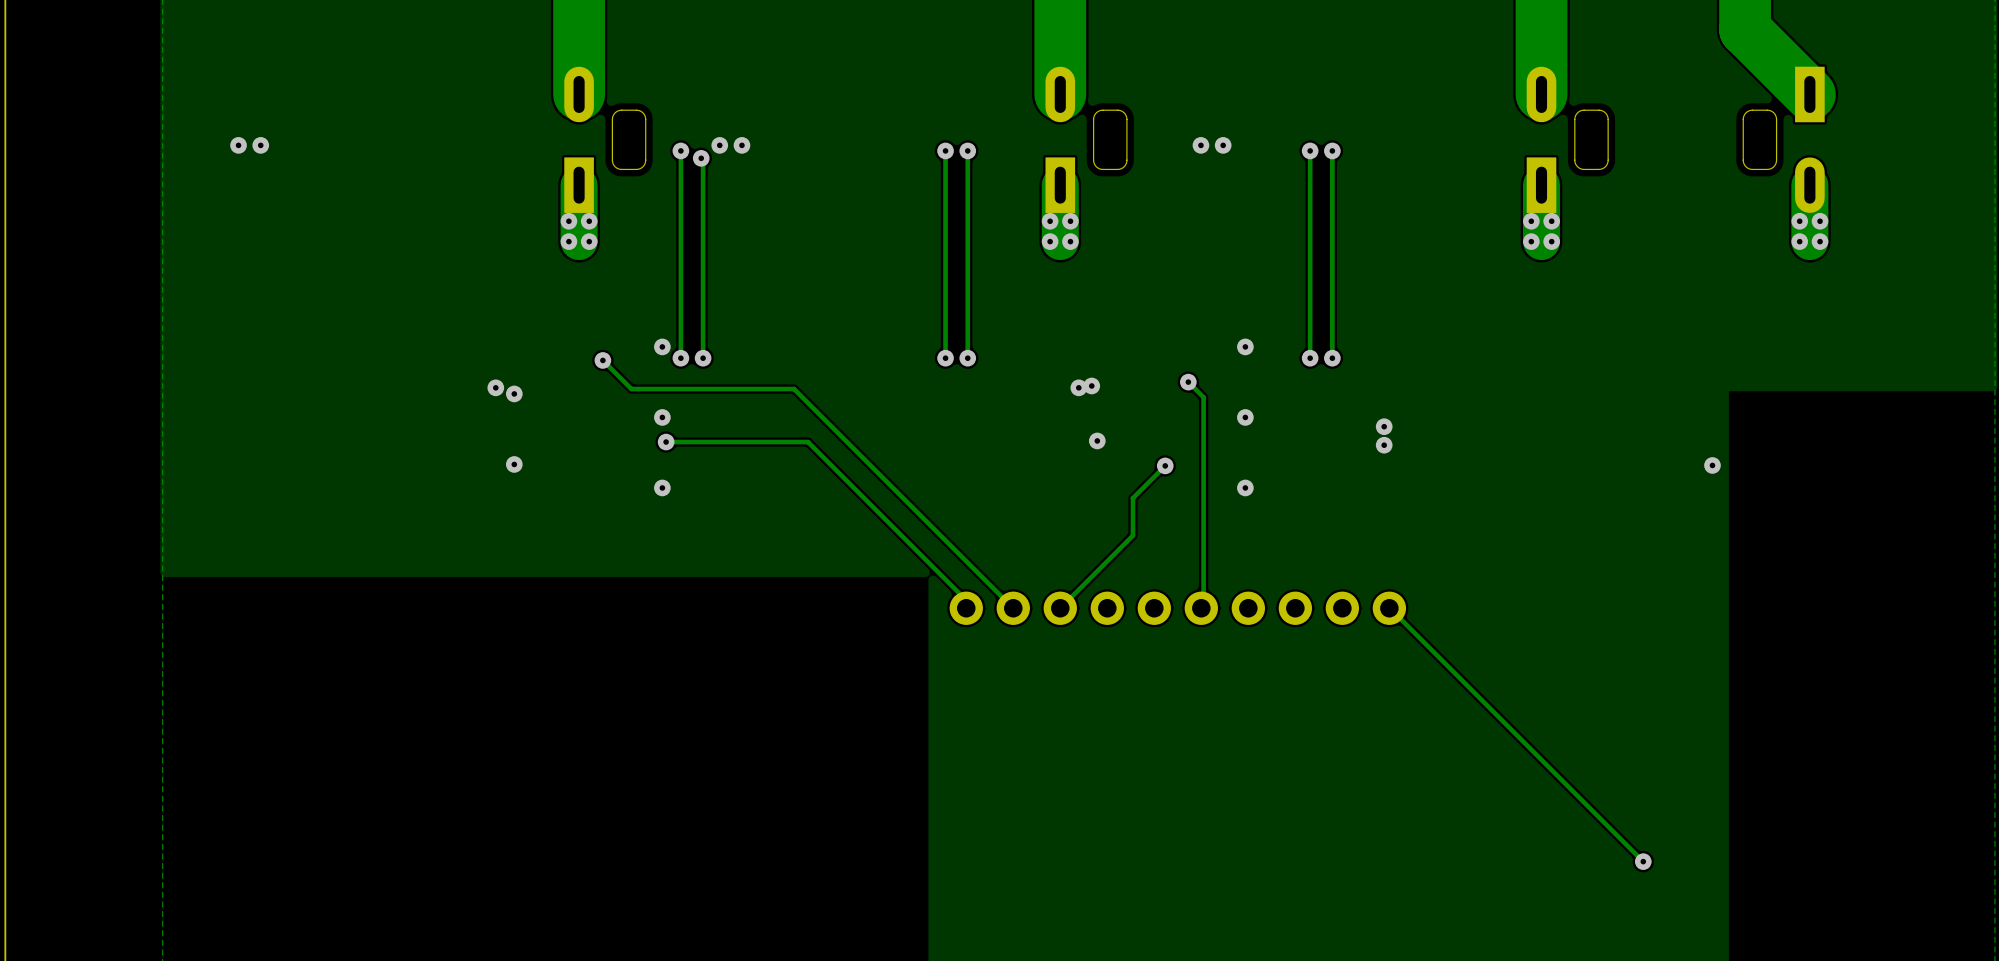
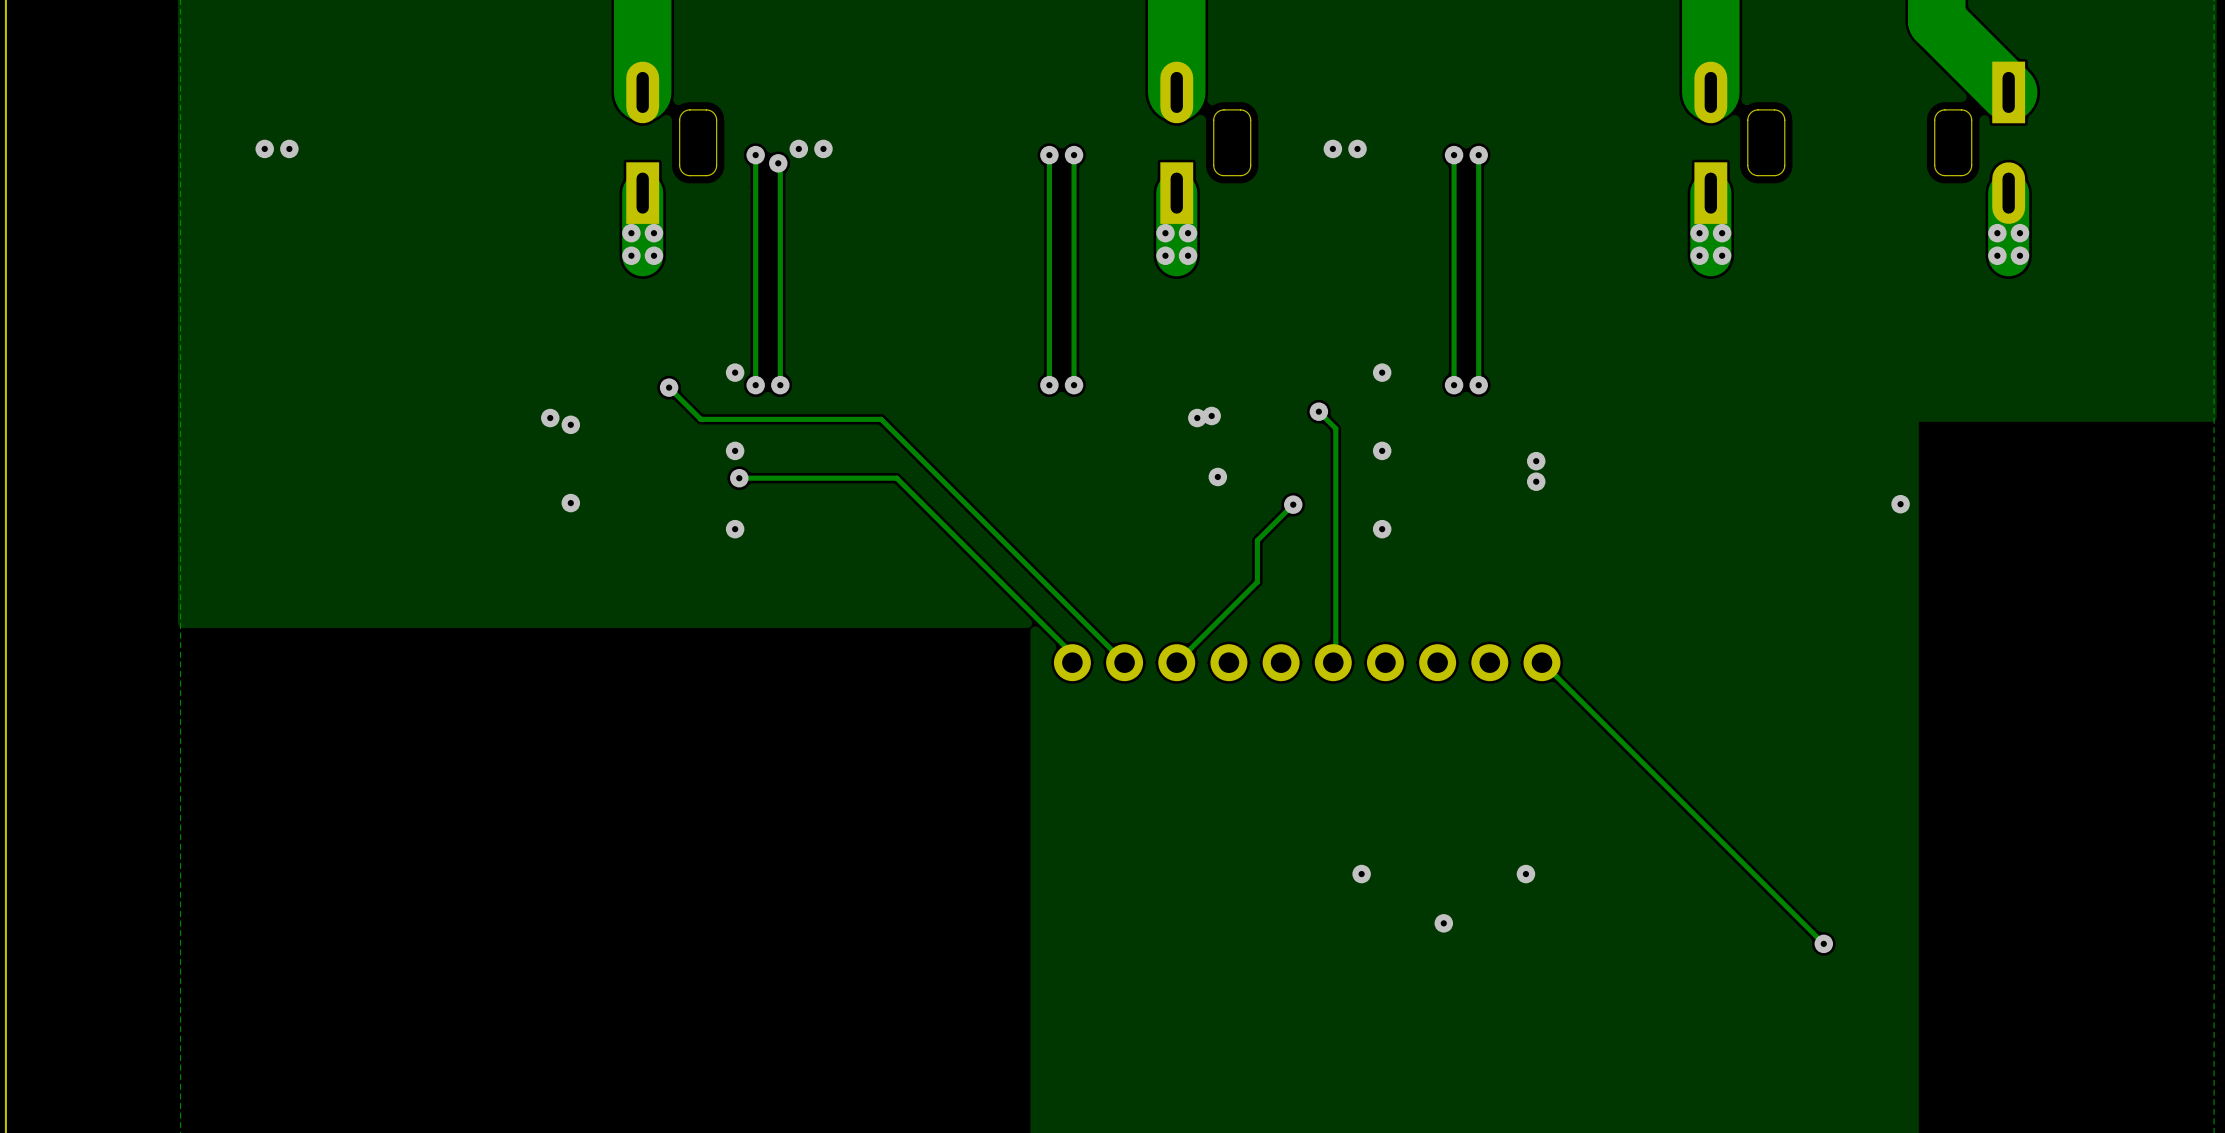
via: none -> (1361, 874)
via: none -> (1525, 874)
via: none -> (1443, 923)

